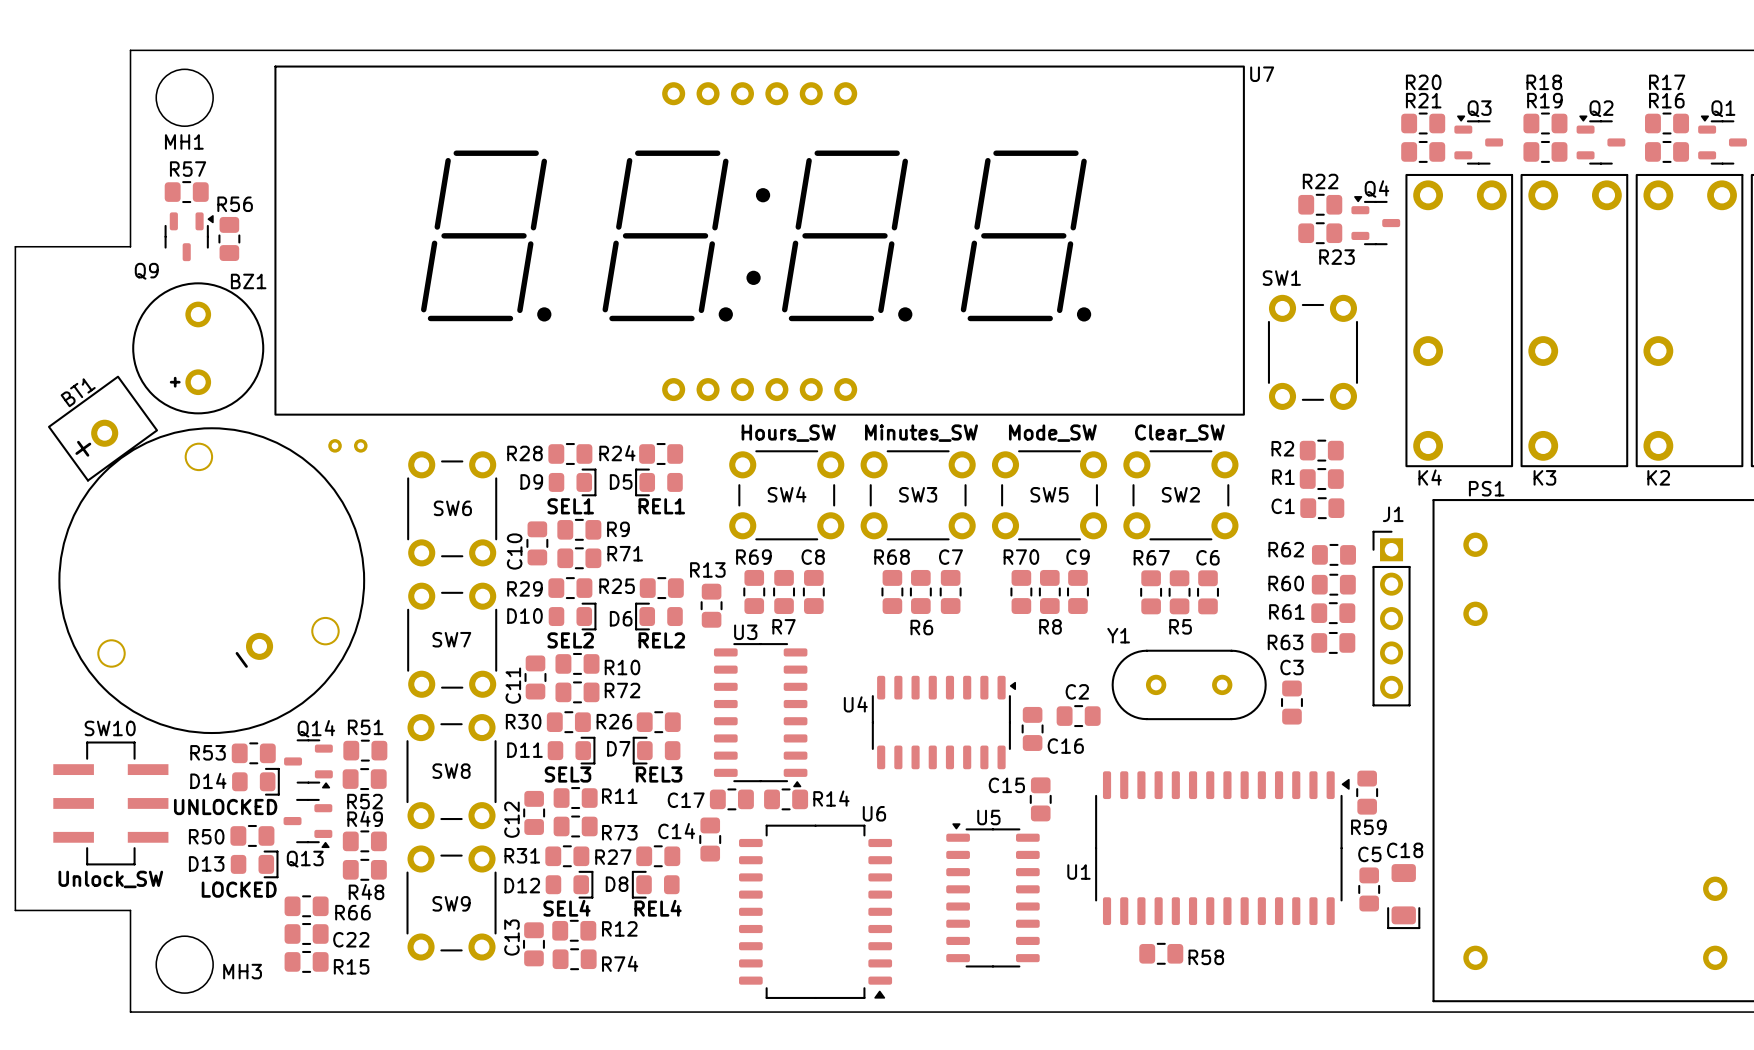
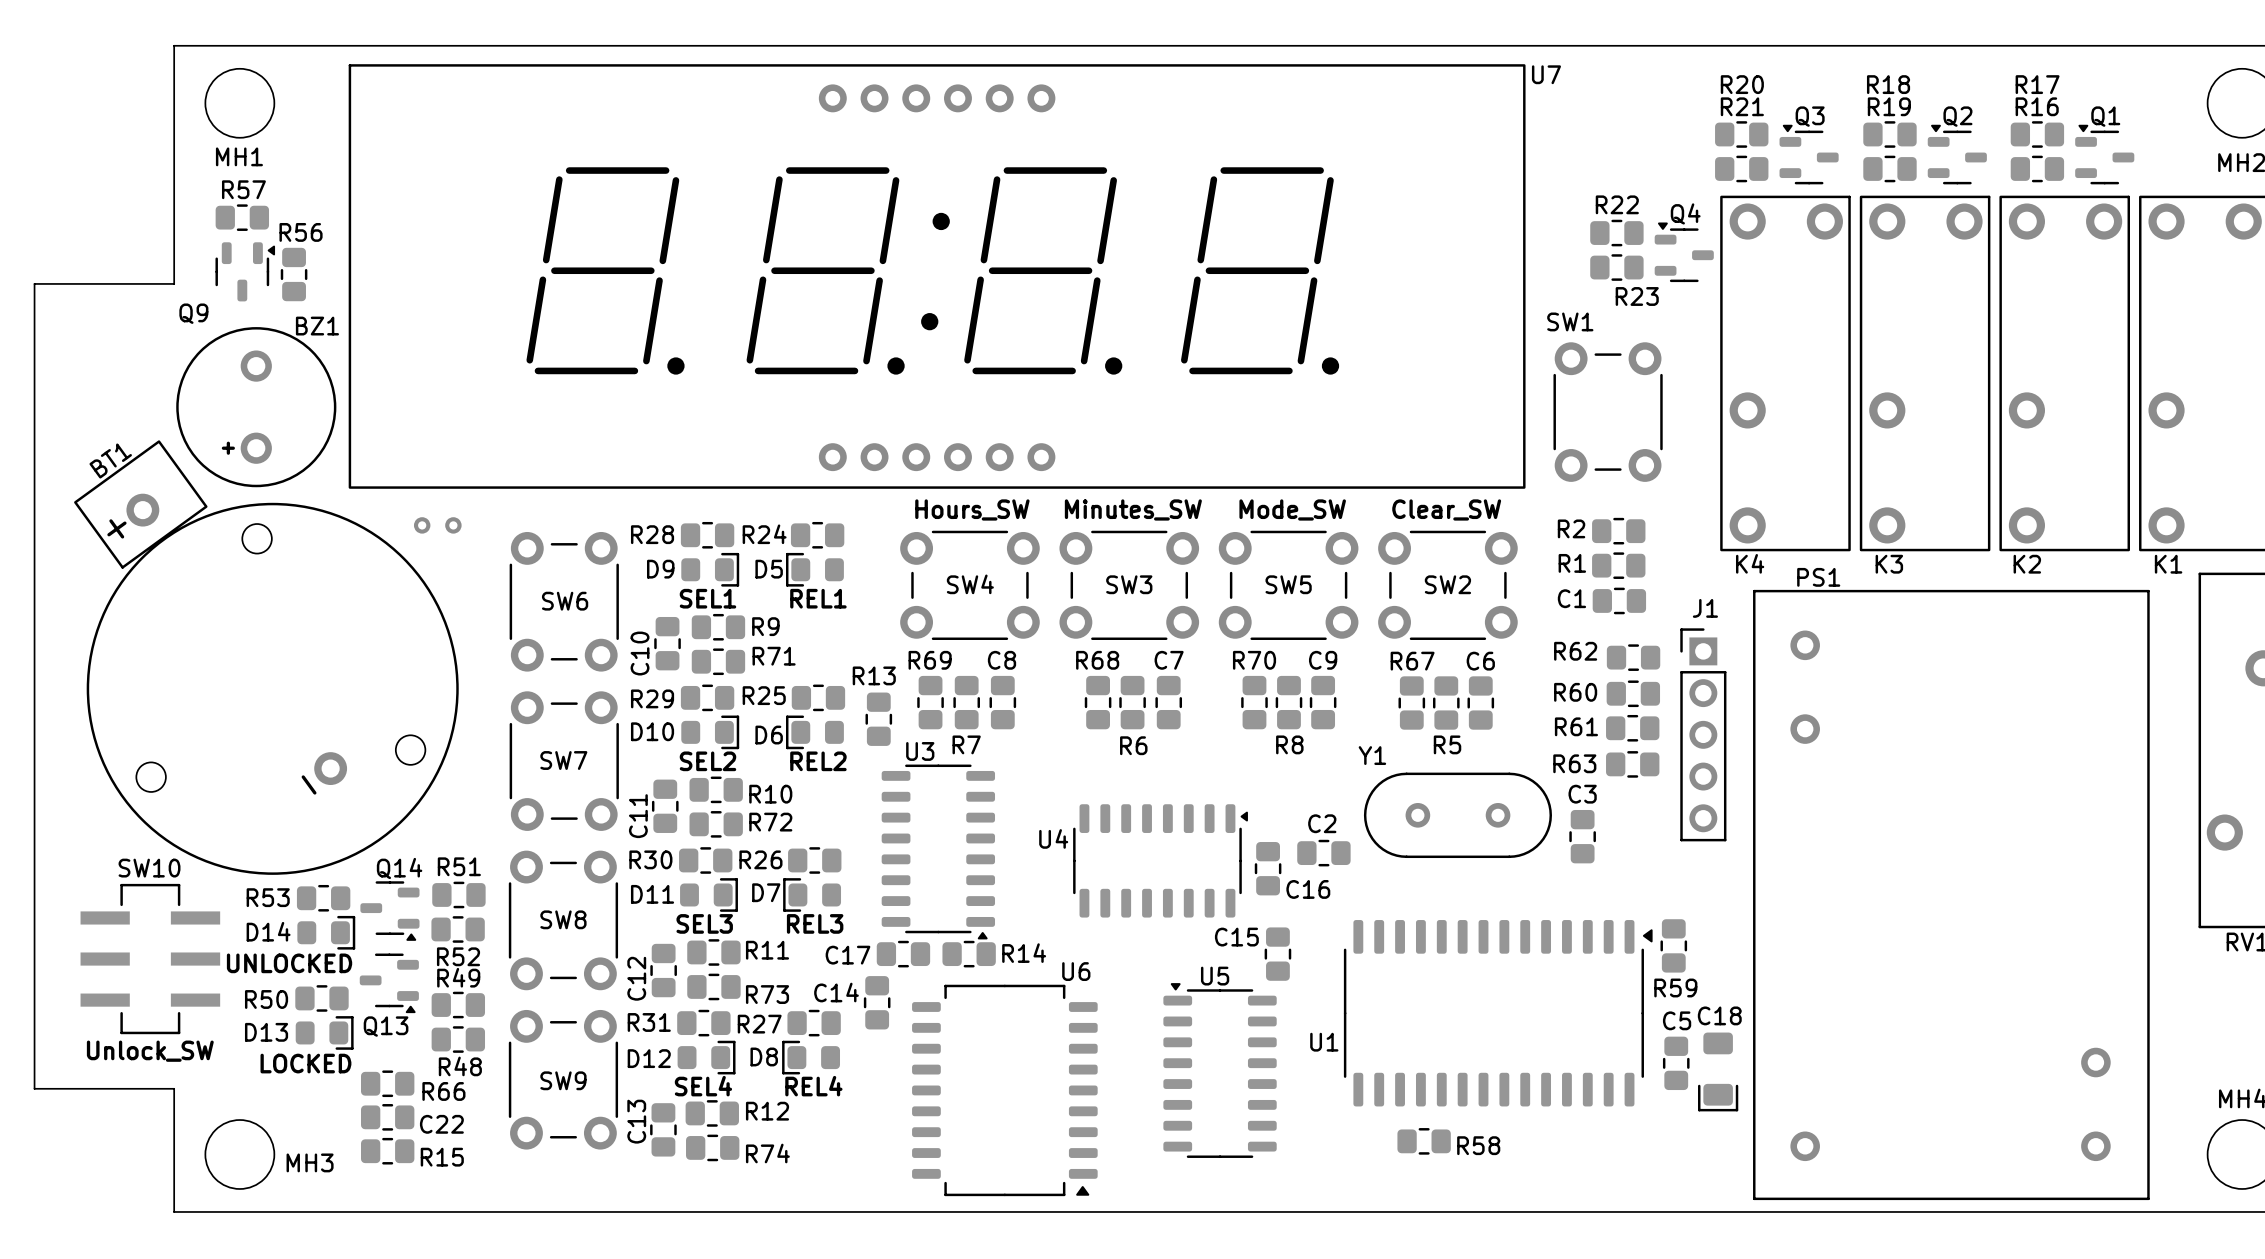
BT1 footprint: [47, 375, 366, 735] -> [74, 440, 459, 875]

